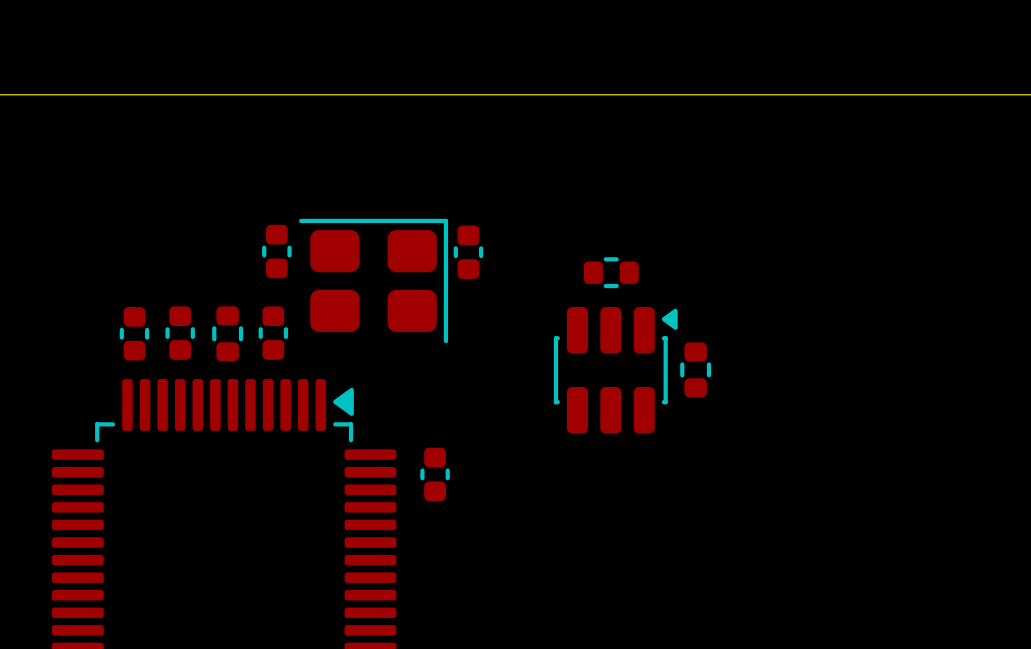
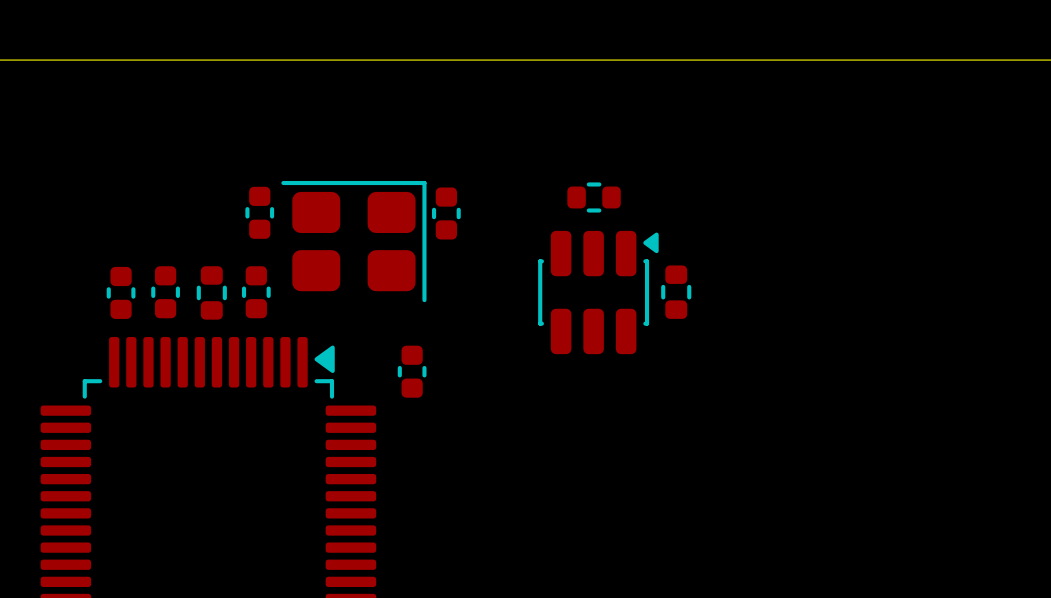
part position: (611, 272) -> (594, 197)
part position: (695, 369) -> (676, 292)
part position: (615, 370) -> (598, 292)
part position: (435, 474) -> (412, 371)

